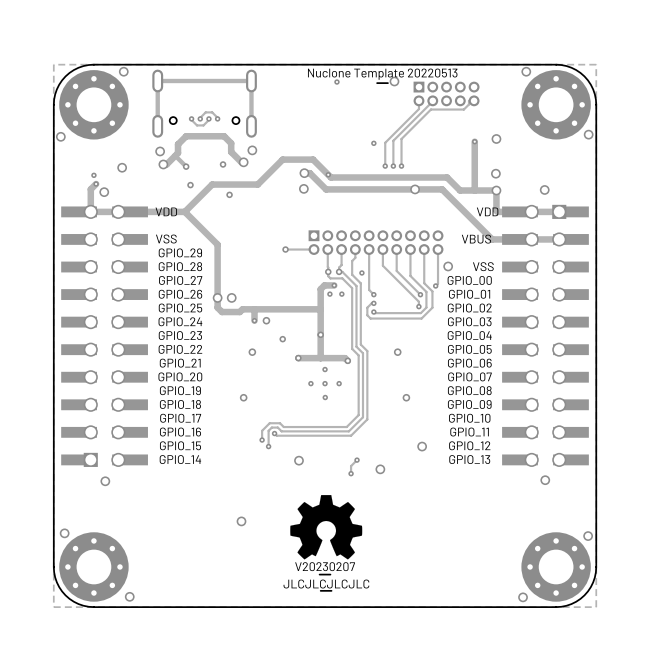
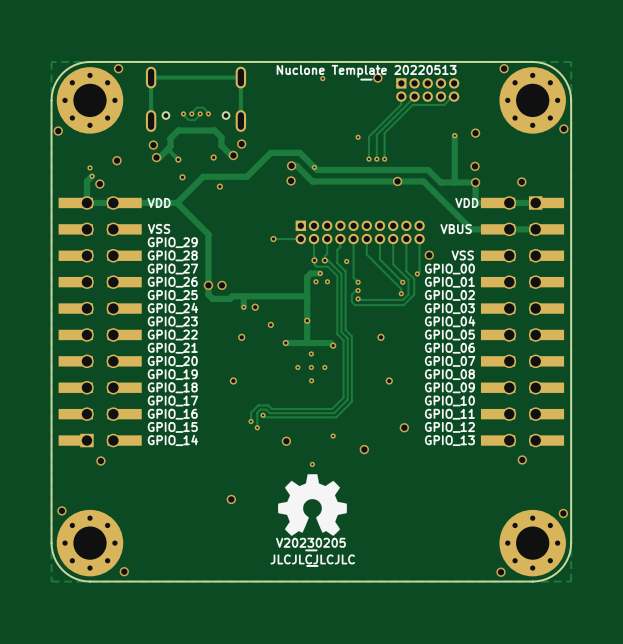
via: none -> (333, 436)
track: (357, 460) (351, 466) (351, 473) -> none
via: (357, 460) -> none
via: (351, 473) -> none
via: none -> (312, 464)
drawing shape: [295, 562, 356, 576] -> [276, 537, 346, 552]

